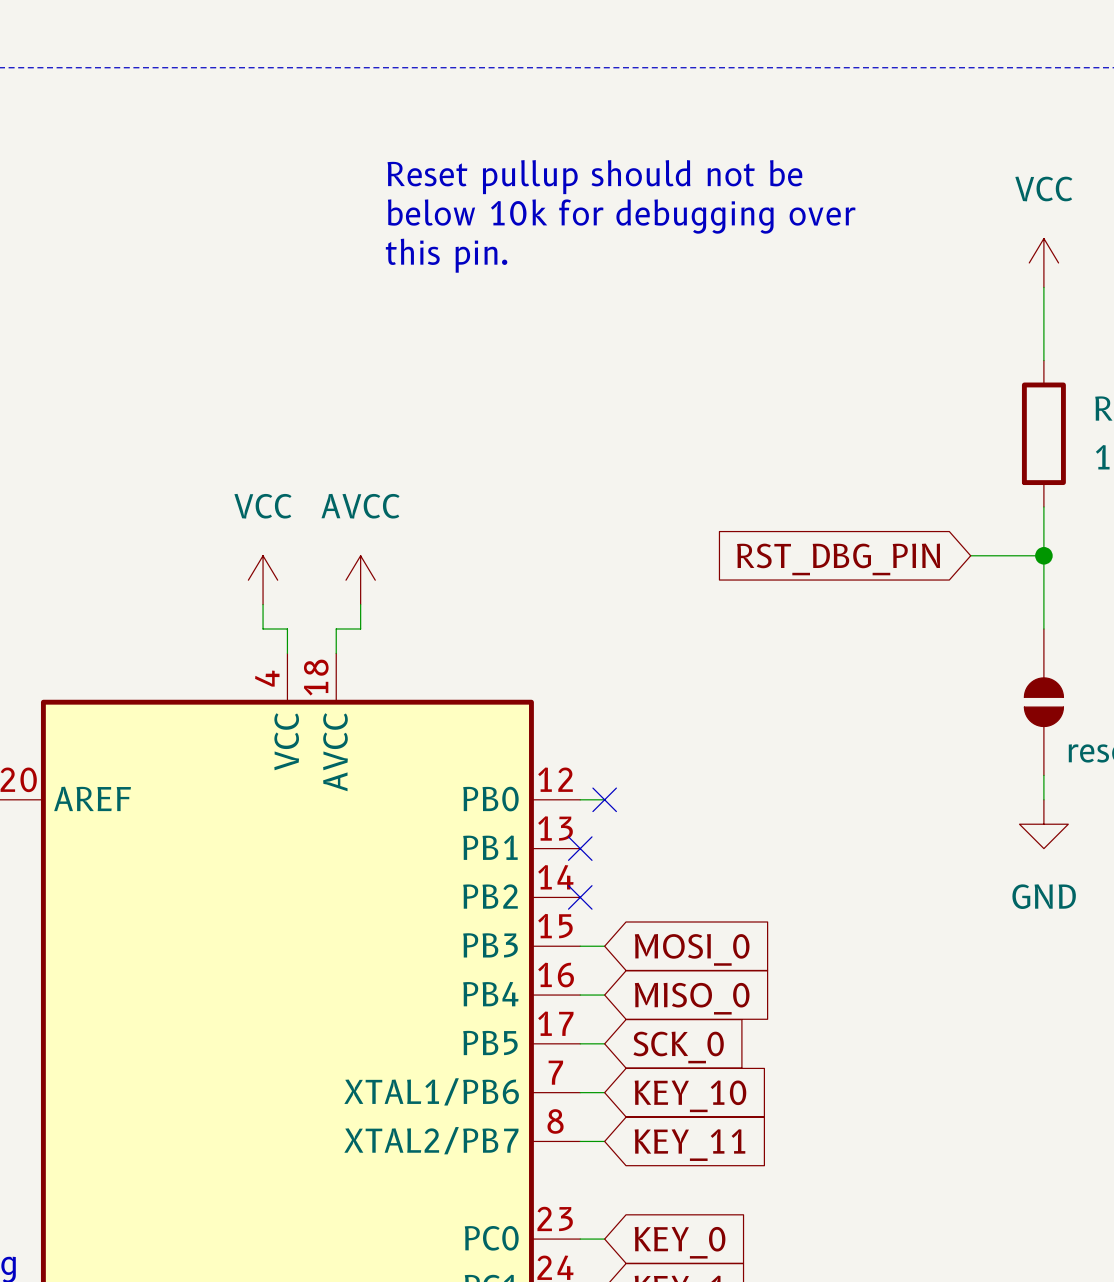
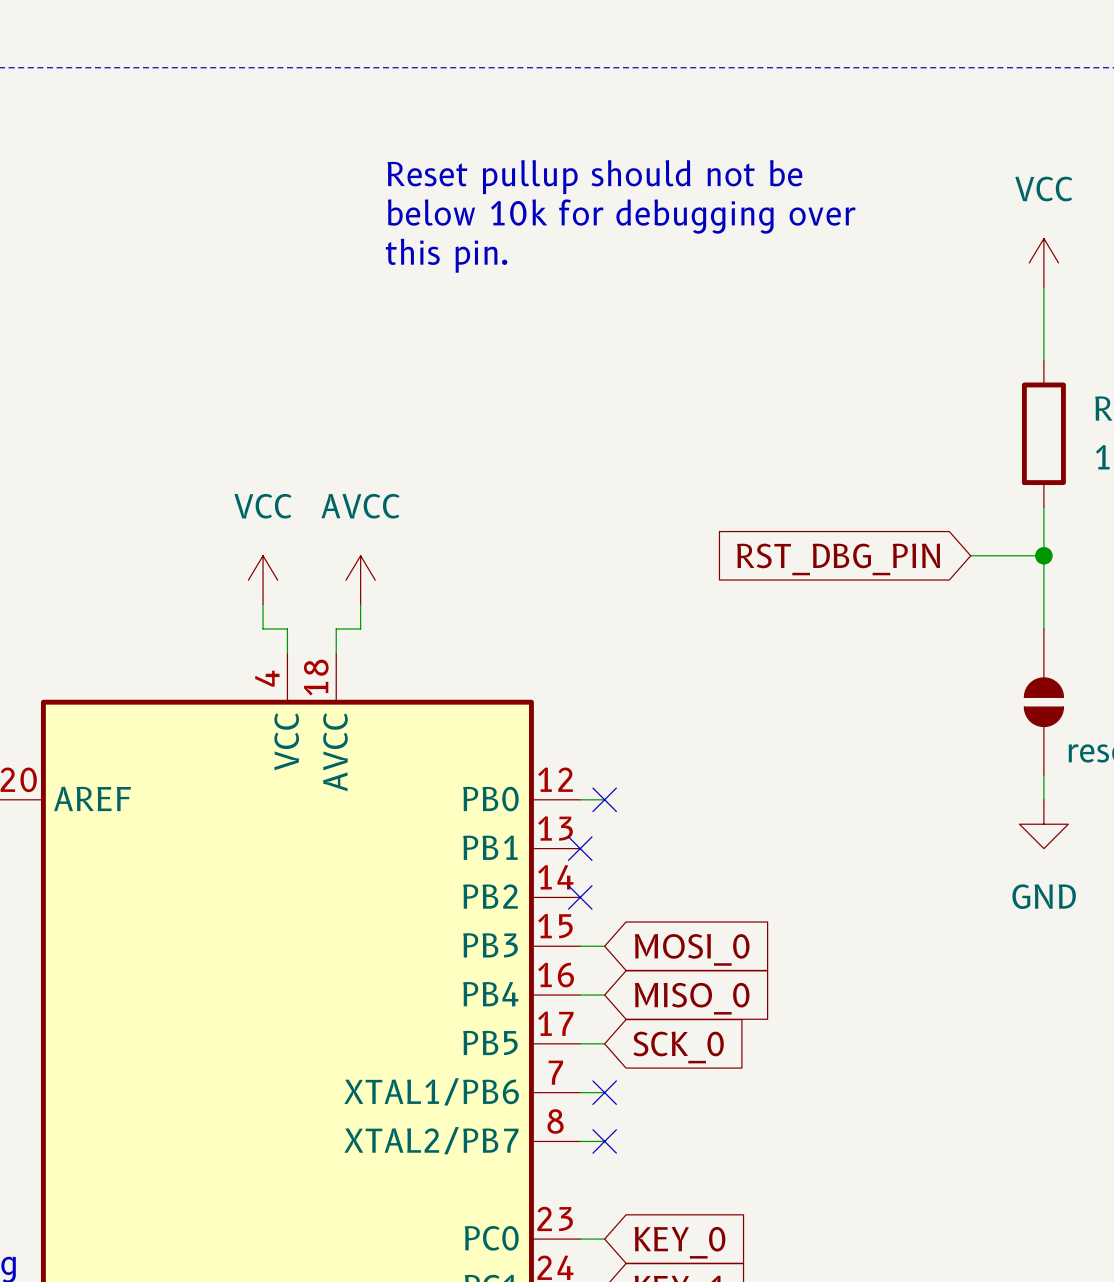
no-connect mark: none -> (604, 1092)
global label: KEY_10 (690, 1096) -> none
no-connect mark: none -> (604, 1141)
global label: KEY_11 (689, 1145) -> none

